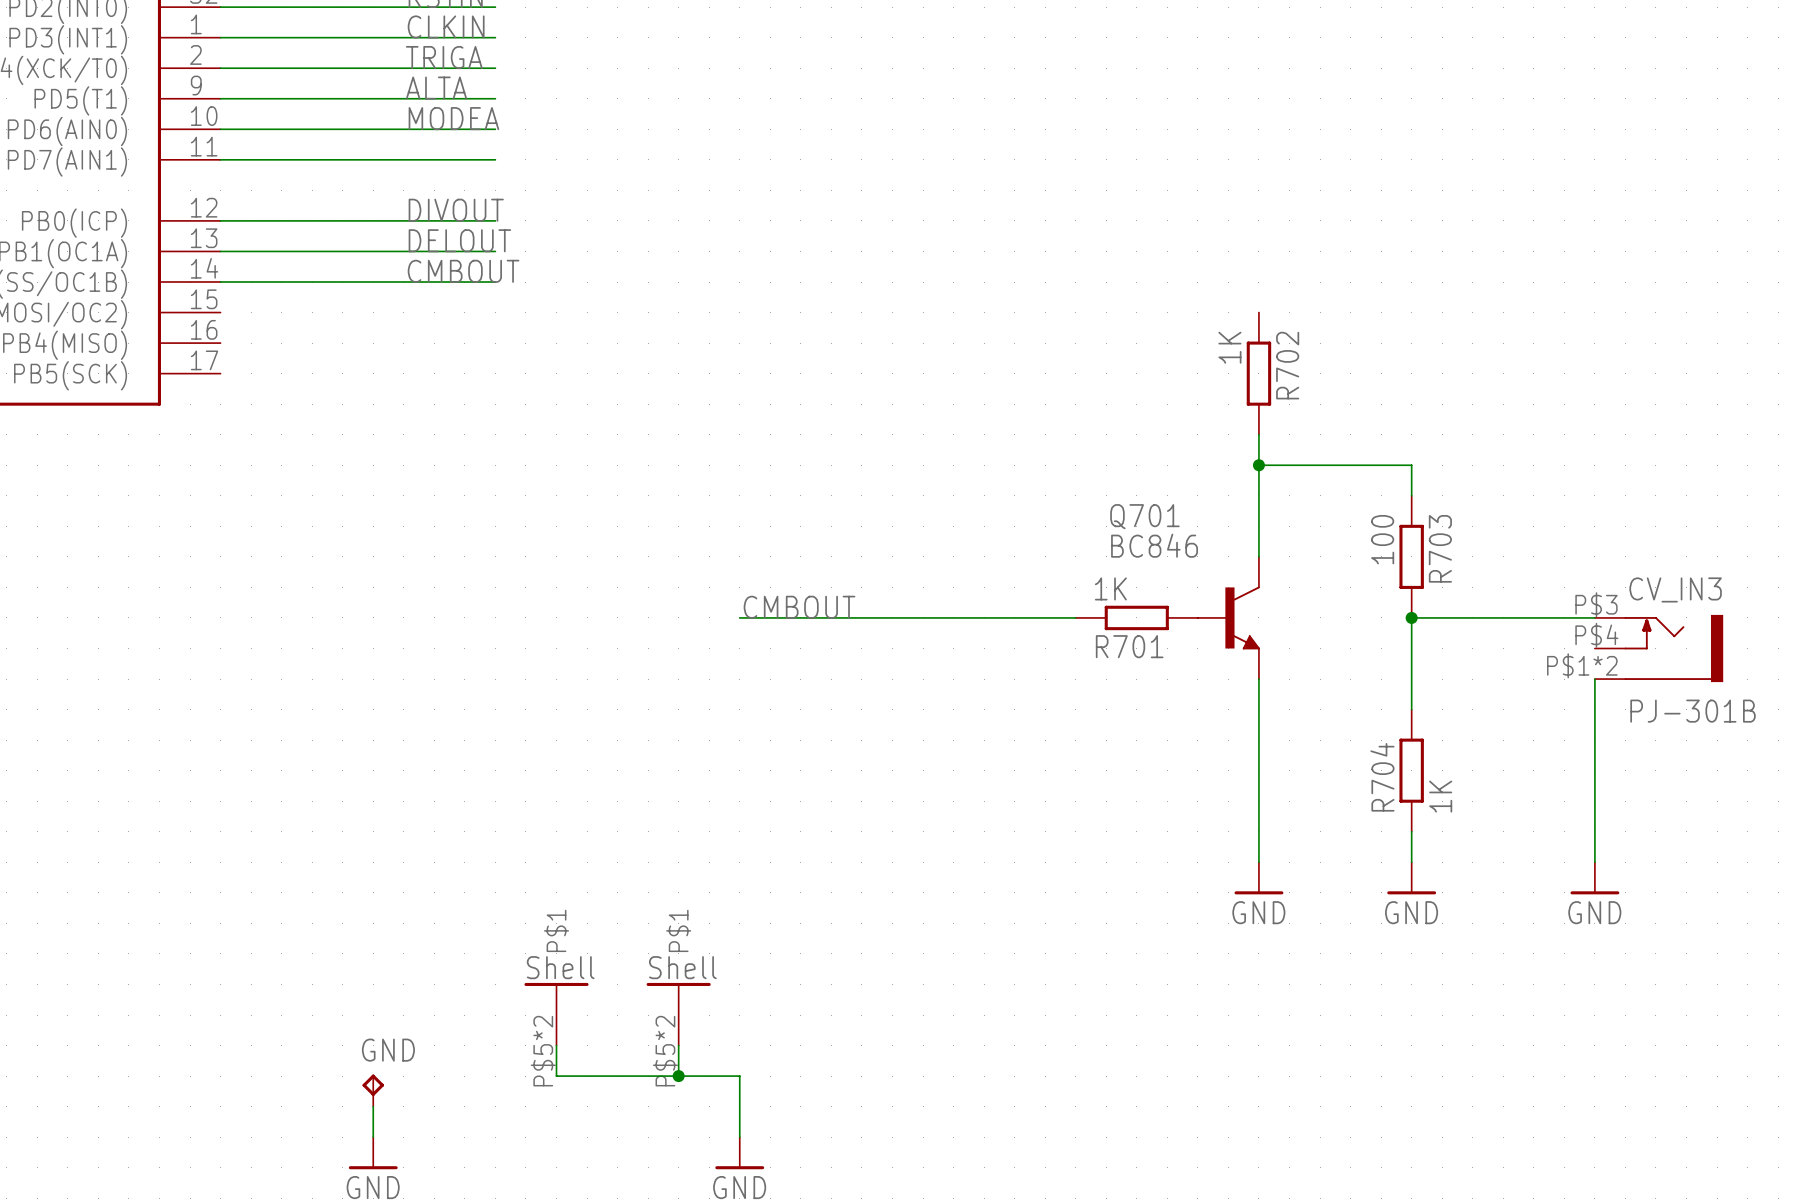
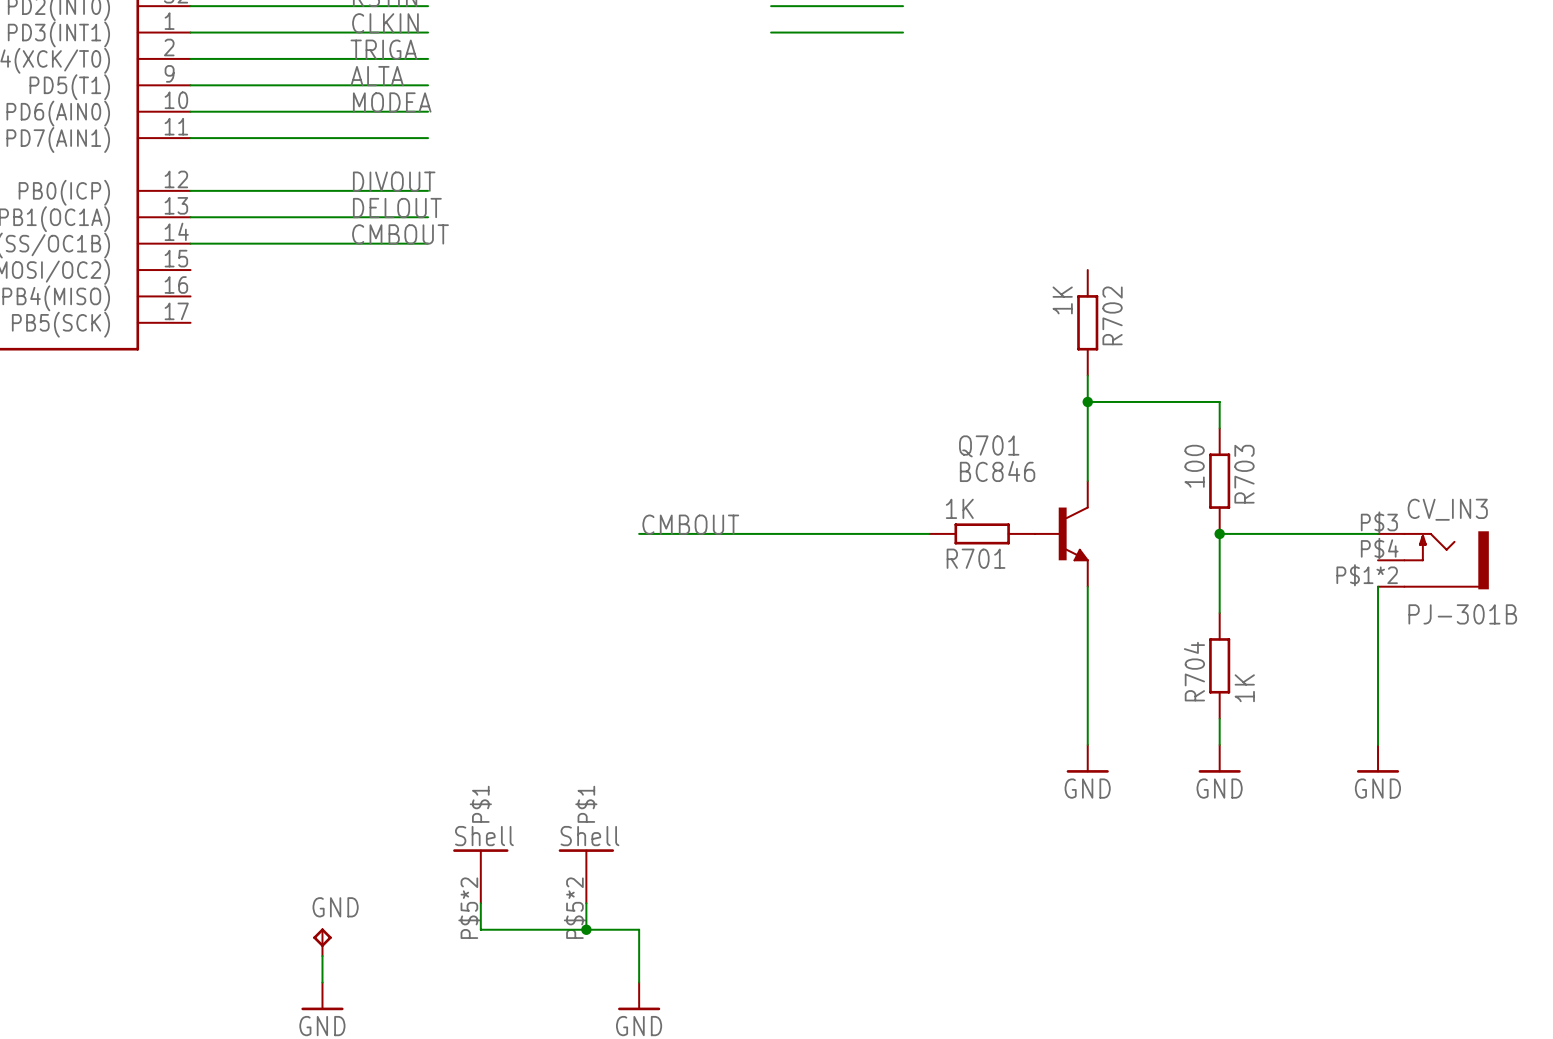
wire: none -> (771, 6) (903, 6)
wire: none -> (771, 32) (903, 32)

